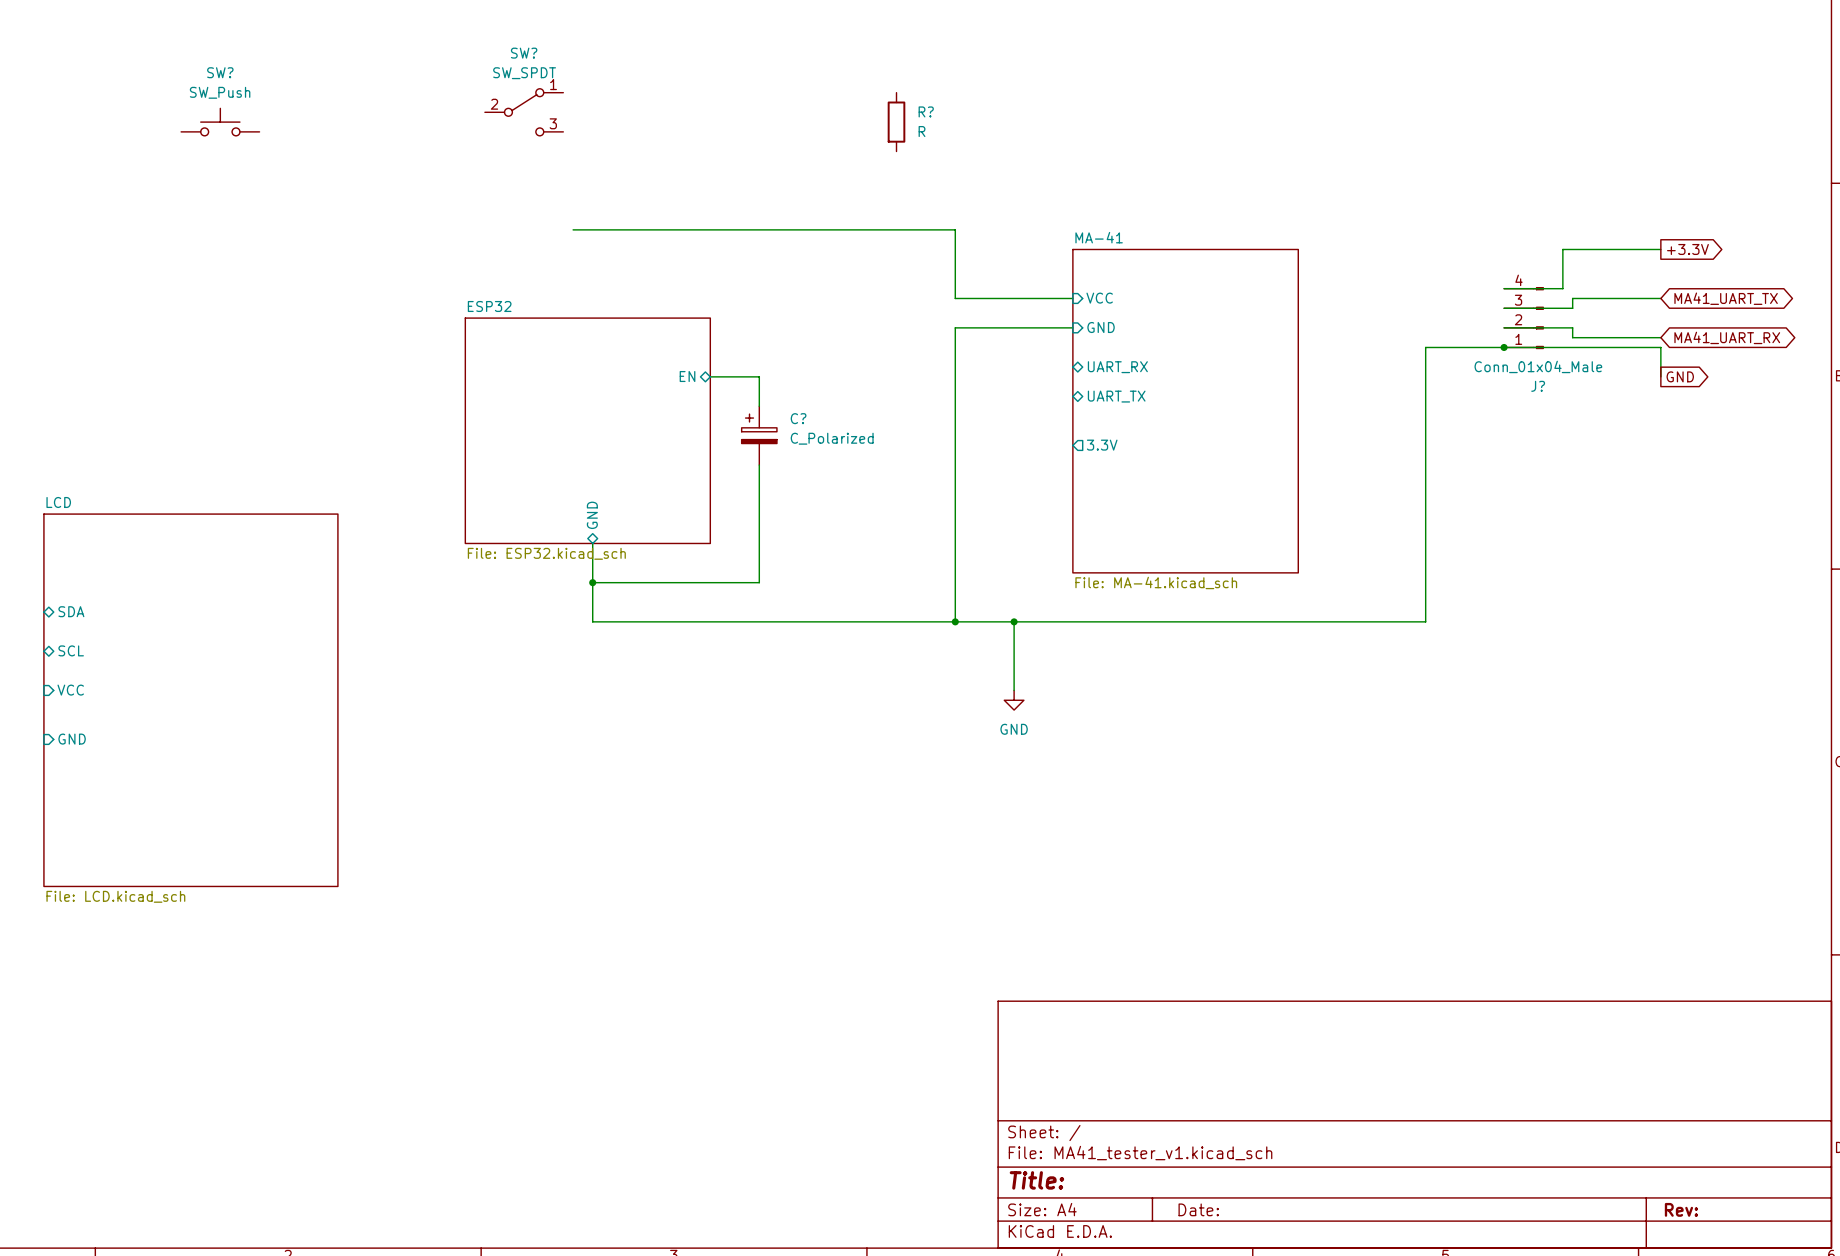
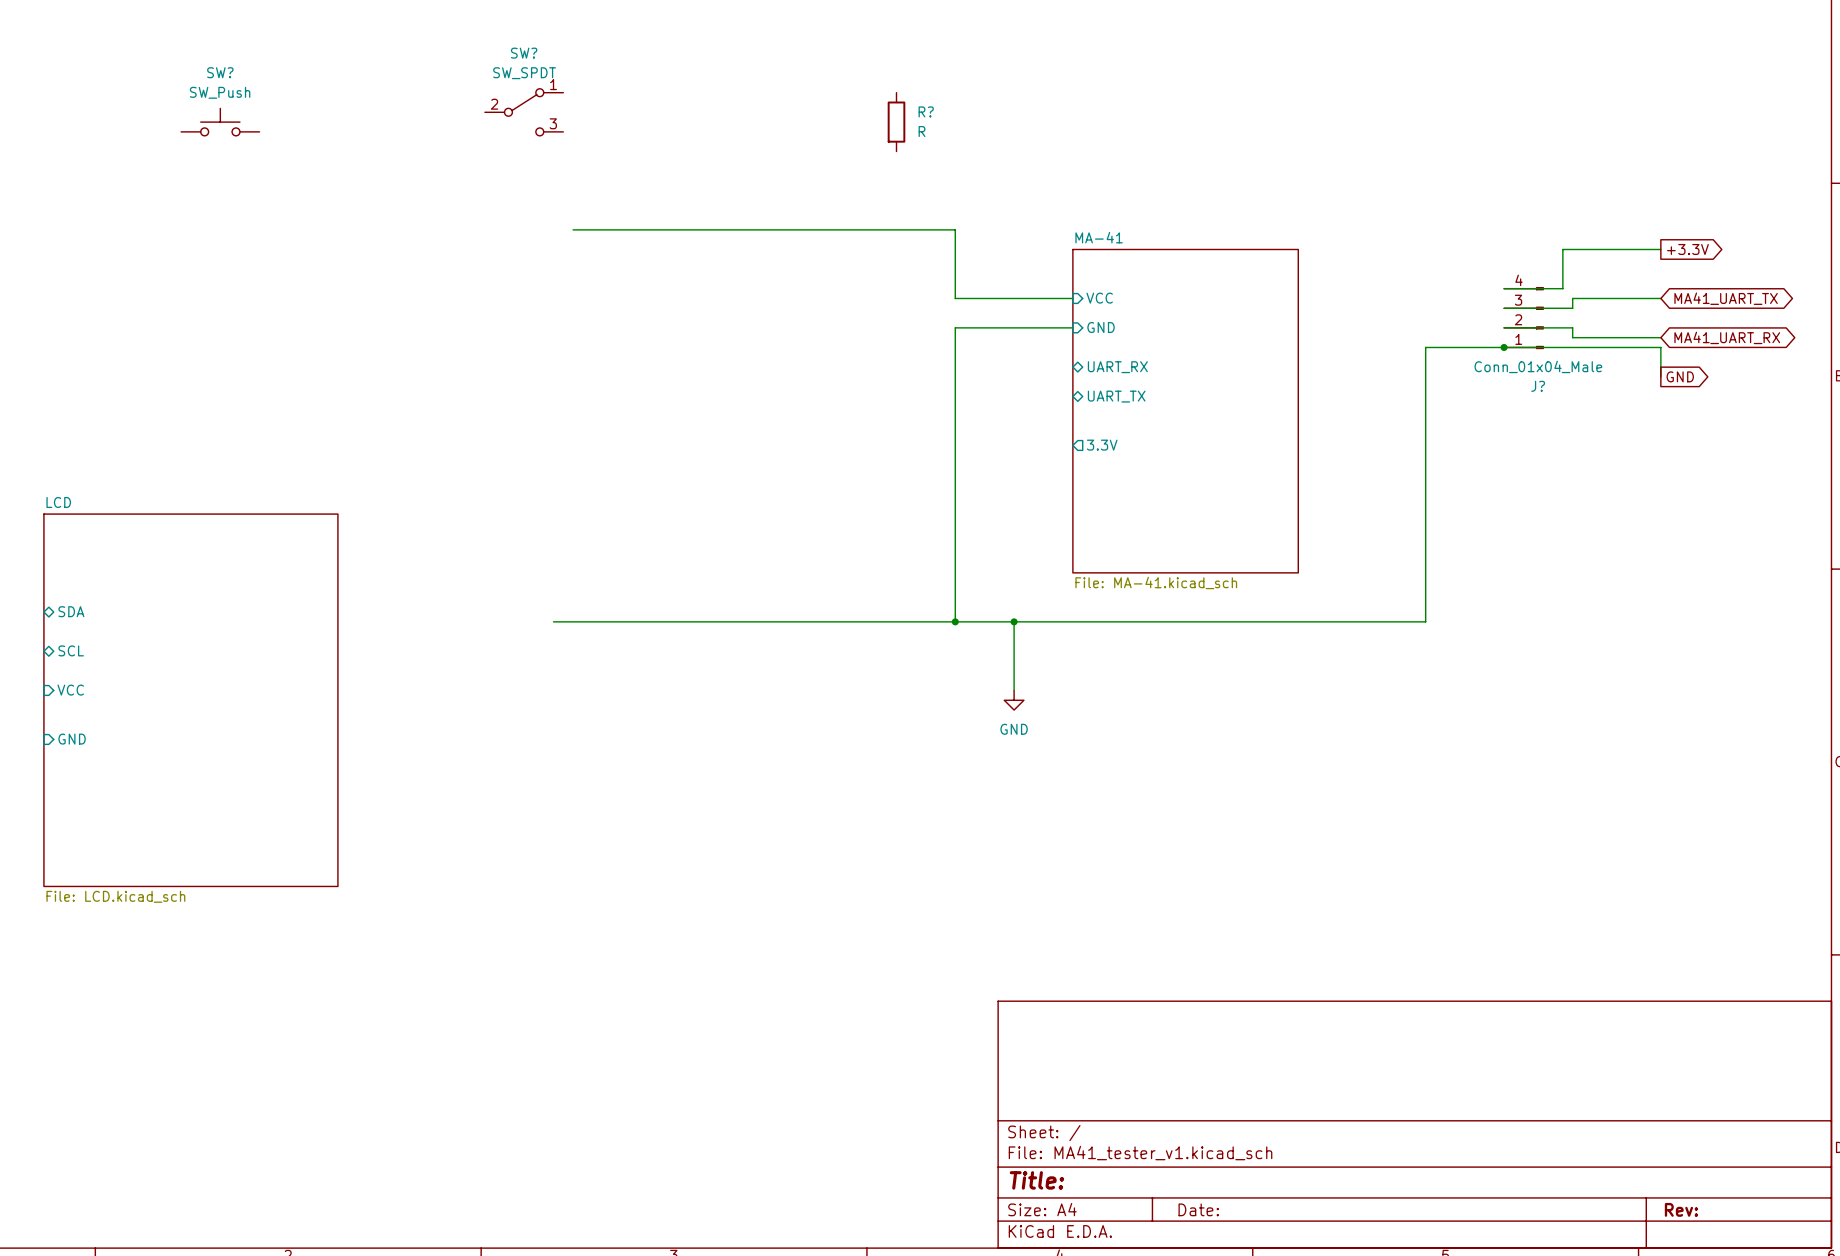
sheet pin: EN (687, 376) -> none
wire: (710, 376) (759, 376) (759, 406) -> none
sheet ESP32: File: ESP32.kicad_sch (587, 430) -> none
C?: C_Polarized (759, 435) -> none
wire: (759, 465) (759, 582) (592, 582) -> none
sheet pin: GND (592, 515) -> none
wire: (592, 543) (592, 621) -> (553, 621) (592, 621)
junction: (592, 582) -> none

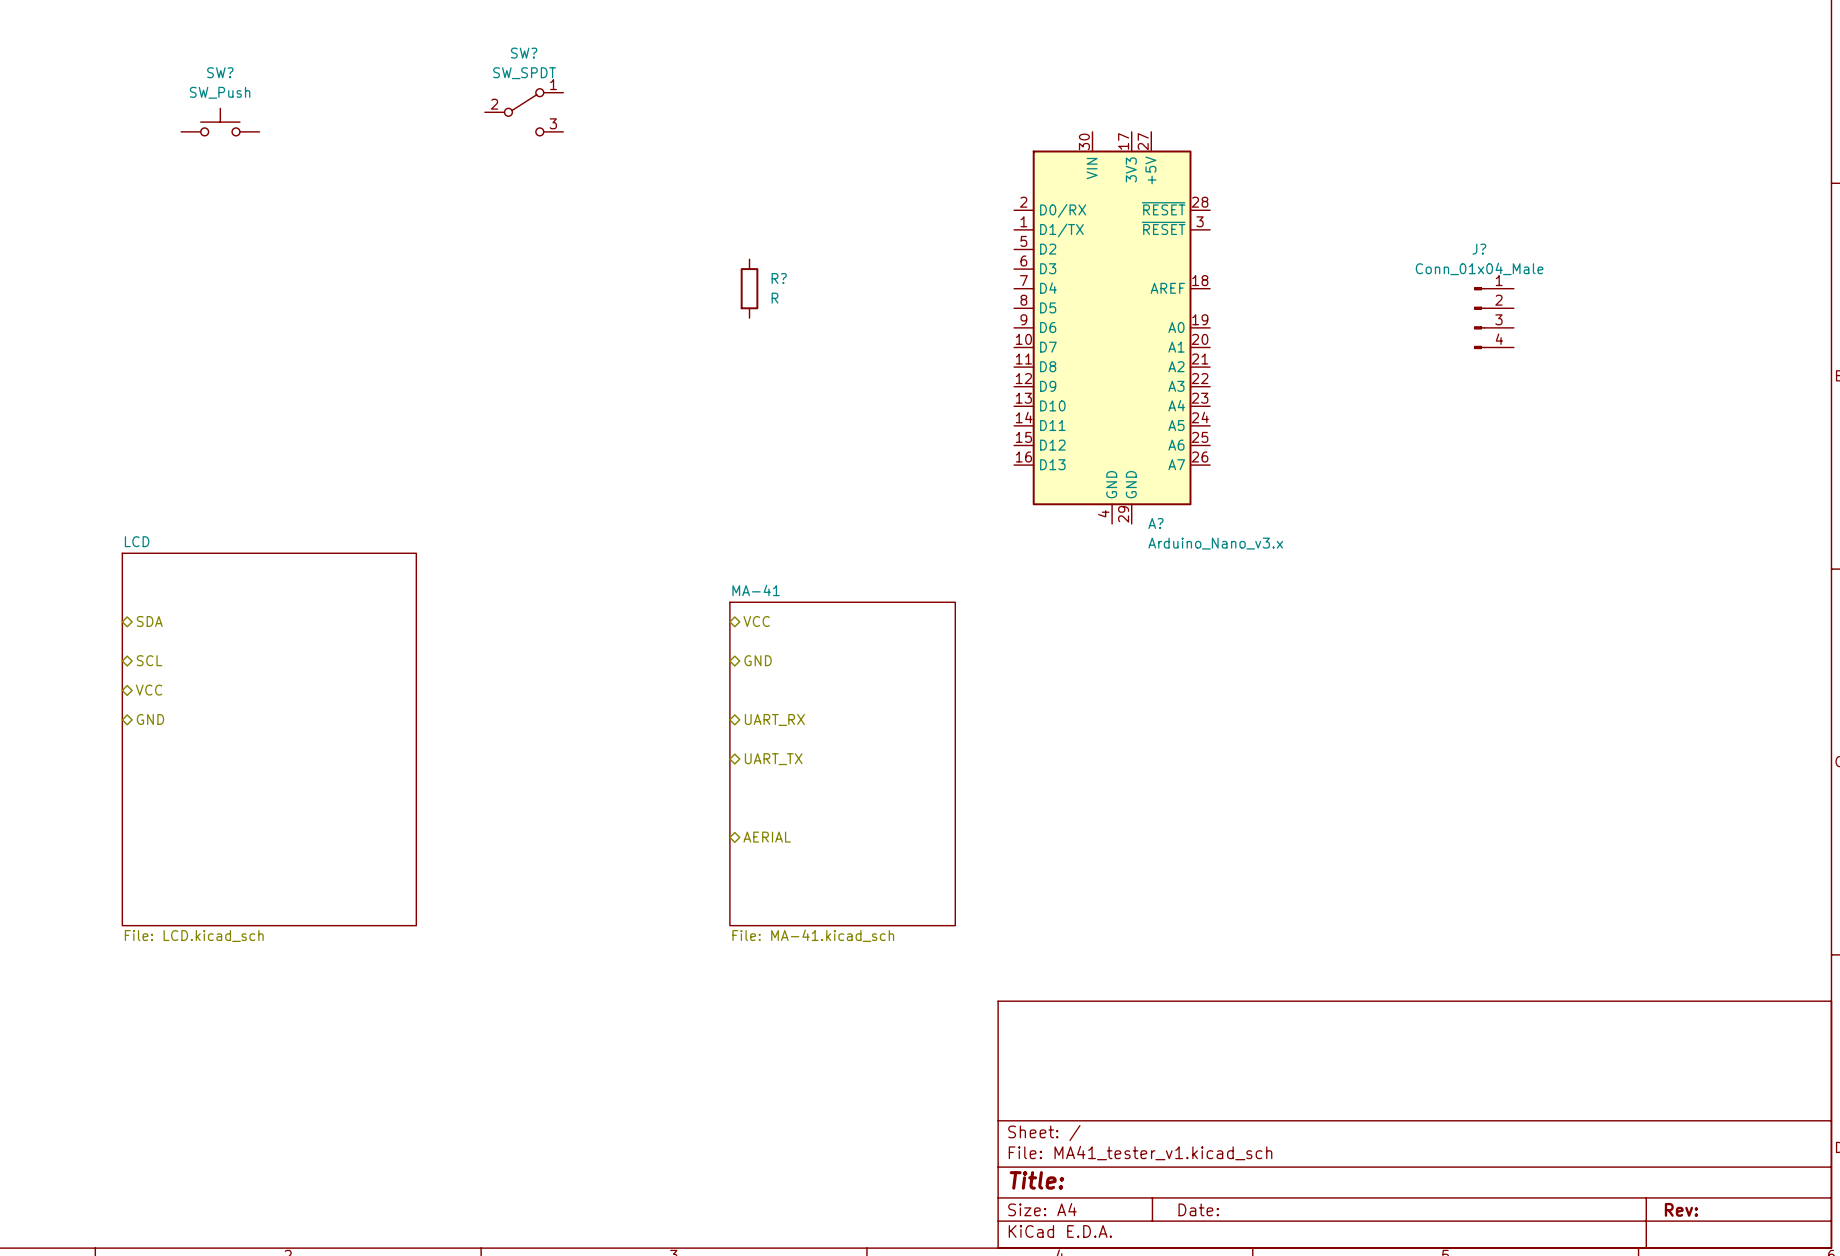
R?: R (896, 122) -> none
wire: (573, 229) (955, 229) (955, 298) (1072, 298) -> none
wire: (1660, 249) (1562, 249) (1562, 288) (1504, 288) -> none
global label: +3.3V (1687, 249) -> none
R?: none -> R (749, 288)
sheet pin: VCC (1099, 298) -> none
wire: (1660, 298) (1572, 298) (1572, 308) (1504, 308) -> none
global label: MA41_UART_TX (1726, 298) -> none
J? rotation: 0° (1538, 318) -> 180° (1479, 318)
wire: (1072, 327) (955, 327) (955, 621) -> none
sheet pin: GND (1101, 327) -> none
A?: none -> Arduino_Nano_v3.x (1112, 327)
wire: (1504, 327) (1572, 327) (1572, 337) (1660, 337) -> none
global label: MA41_UART_RX (1727, 337) -> none
junction: (1504, 347) -> none
sheet pin: UART_RX (1117, 367) -> none
wire: (1660, 376) (1660, 347) (1425, 347) (1425, 621) (553, 621) -> none
global label: GND (1680, 376) -> none
sheet pin: UART_TX (1116, 396) -> none
sheet MA-41 position: (1185, 411) -> (842, 763)
sheet pin: 3.3V (1102, 445) -> none
sheet pin: SDA (71, 611) -> none
hierarchical label: none -> SDA (149, 621)
hierarchical label: none -> VCC (756, 621)
junction: (955, 621) -> none
wire: (1014, 621) (1014, 690) -> none
junction: (1014, 621) -> none
sheet pin: SCL (71, 650) -> none
hierarchical label: none -> SCL (149, 660)
hierarchical label: none -> GND (758, 660)
sheet pin: VCC (70, 690) -> none
hierarchical label: none -> VCC (149, 690)
sheet LCD position: (190, 700) -> (269, 739)
power symbol: GND (1014, 700) -> none
hierarchical label: none -> GND (150, 719)
hierarchical label: none -> UART_RX (774, 719)
sheet pin: GND (72, 739) -> none
hierarchical label: none -> UART_TX (773, 759)
hierarchical label: none -> AERIAL (767, 837)

